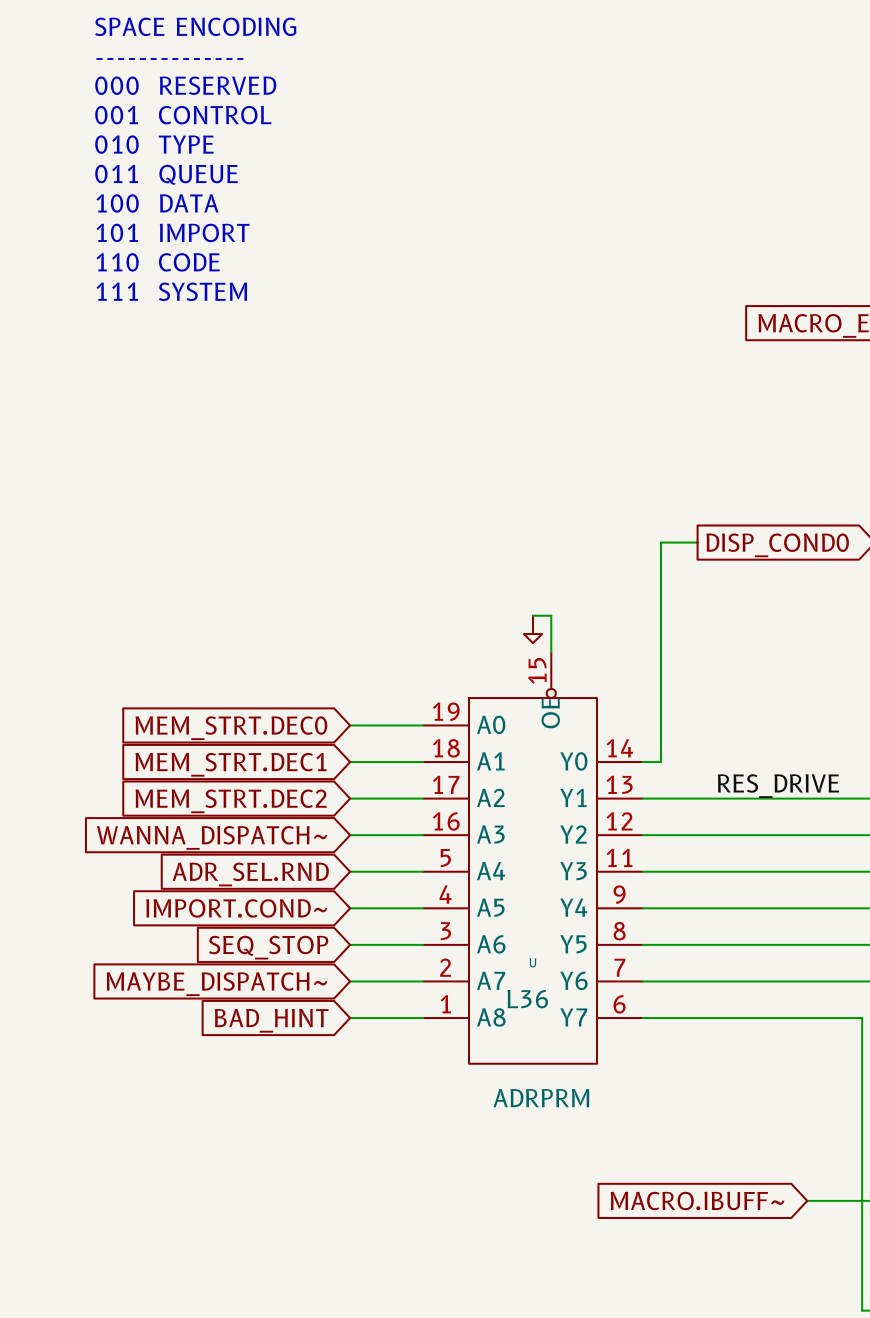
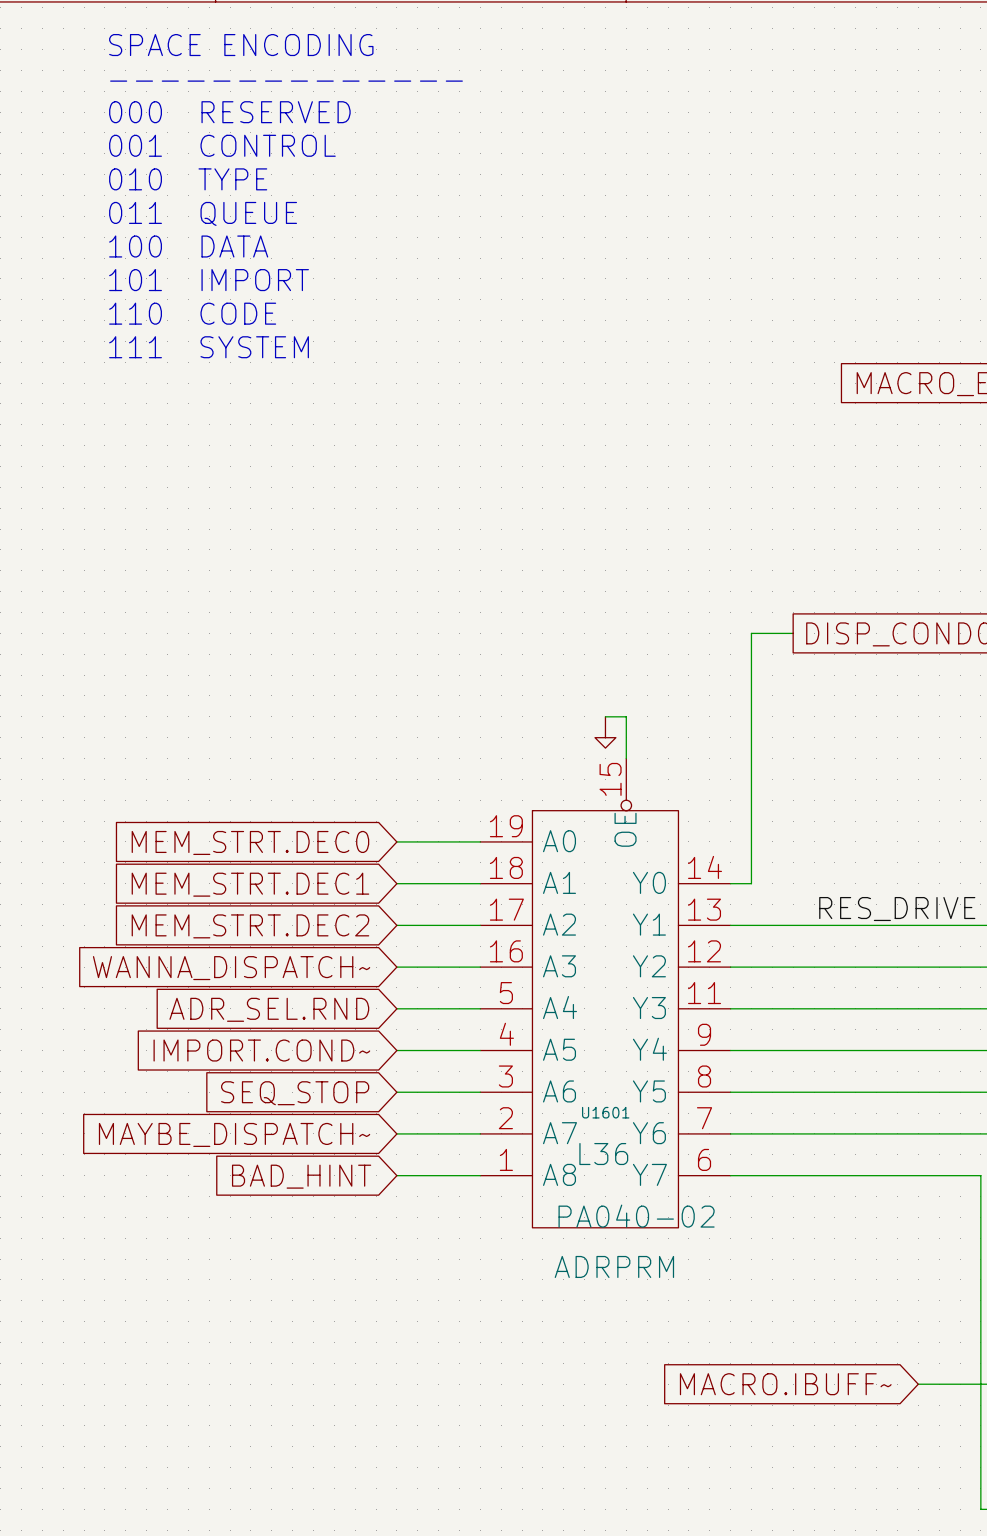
U name: U (532, 962) -> U1601 (605, 1112)
U value: none -> PA040-02 (636, 1216)

